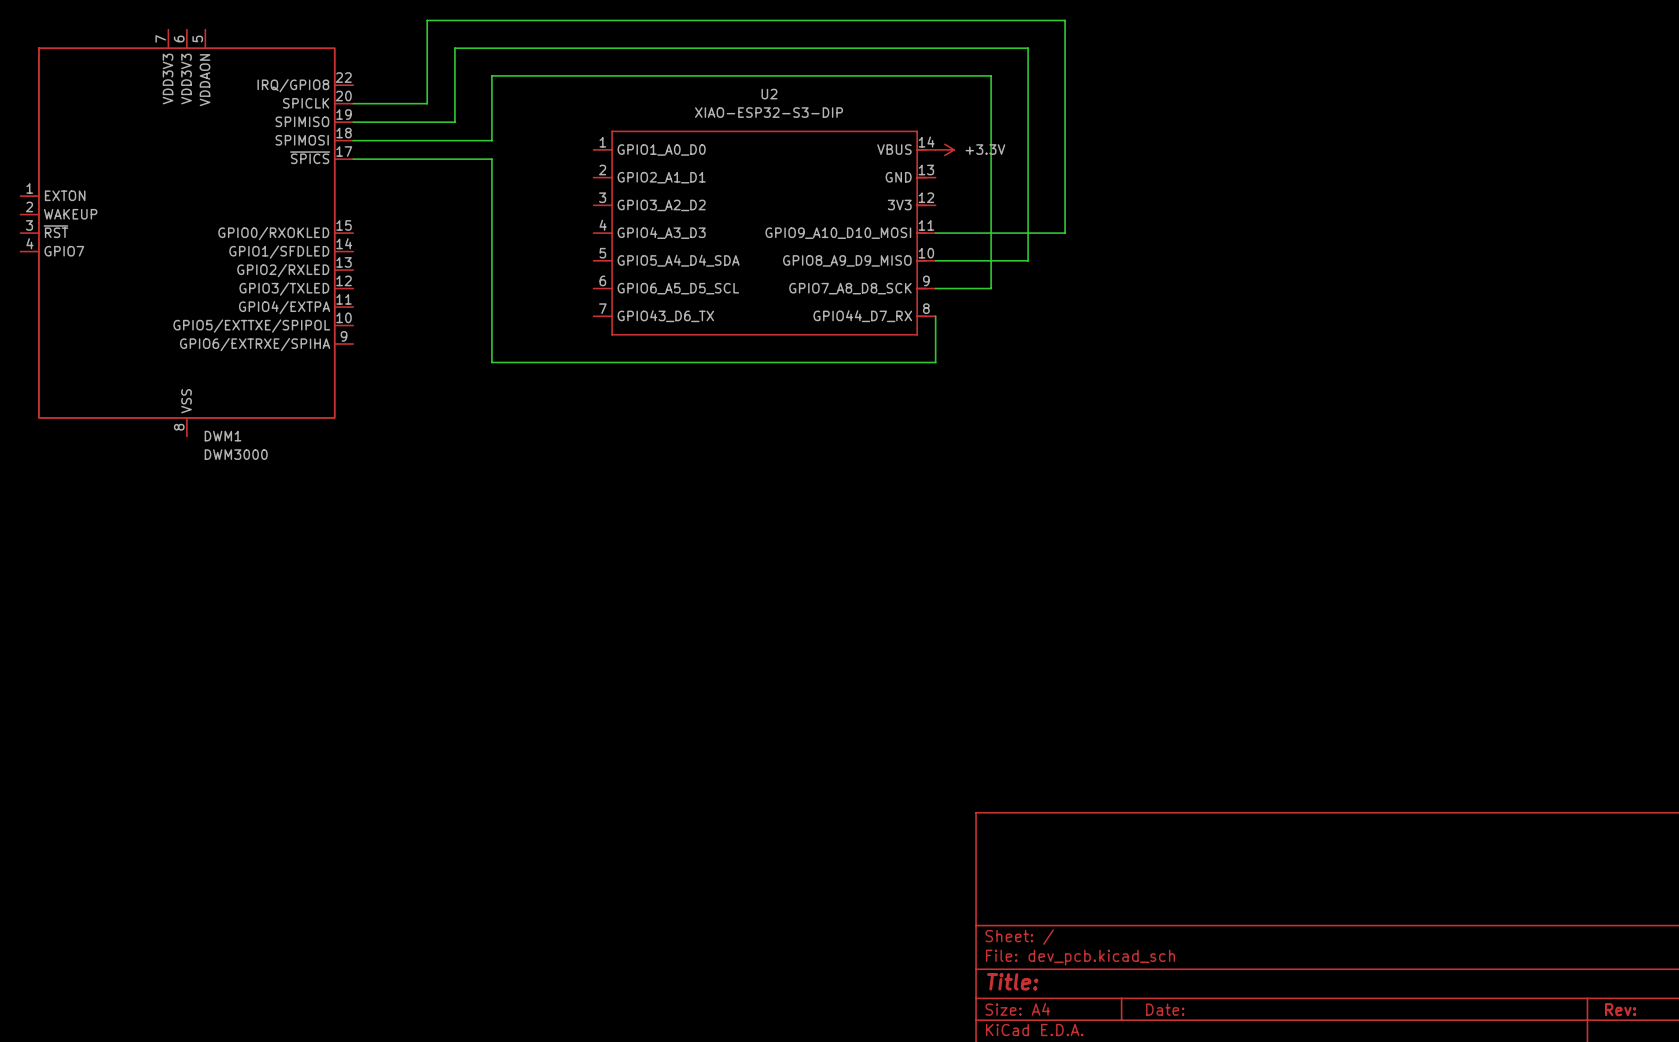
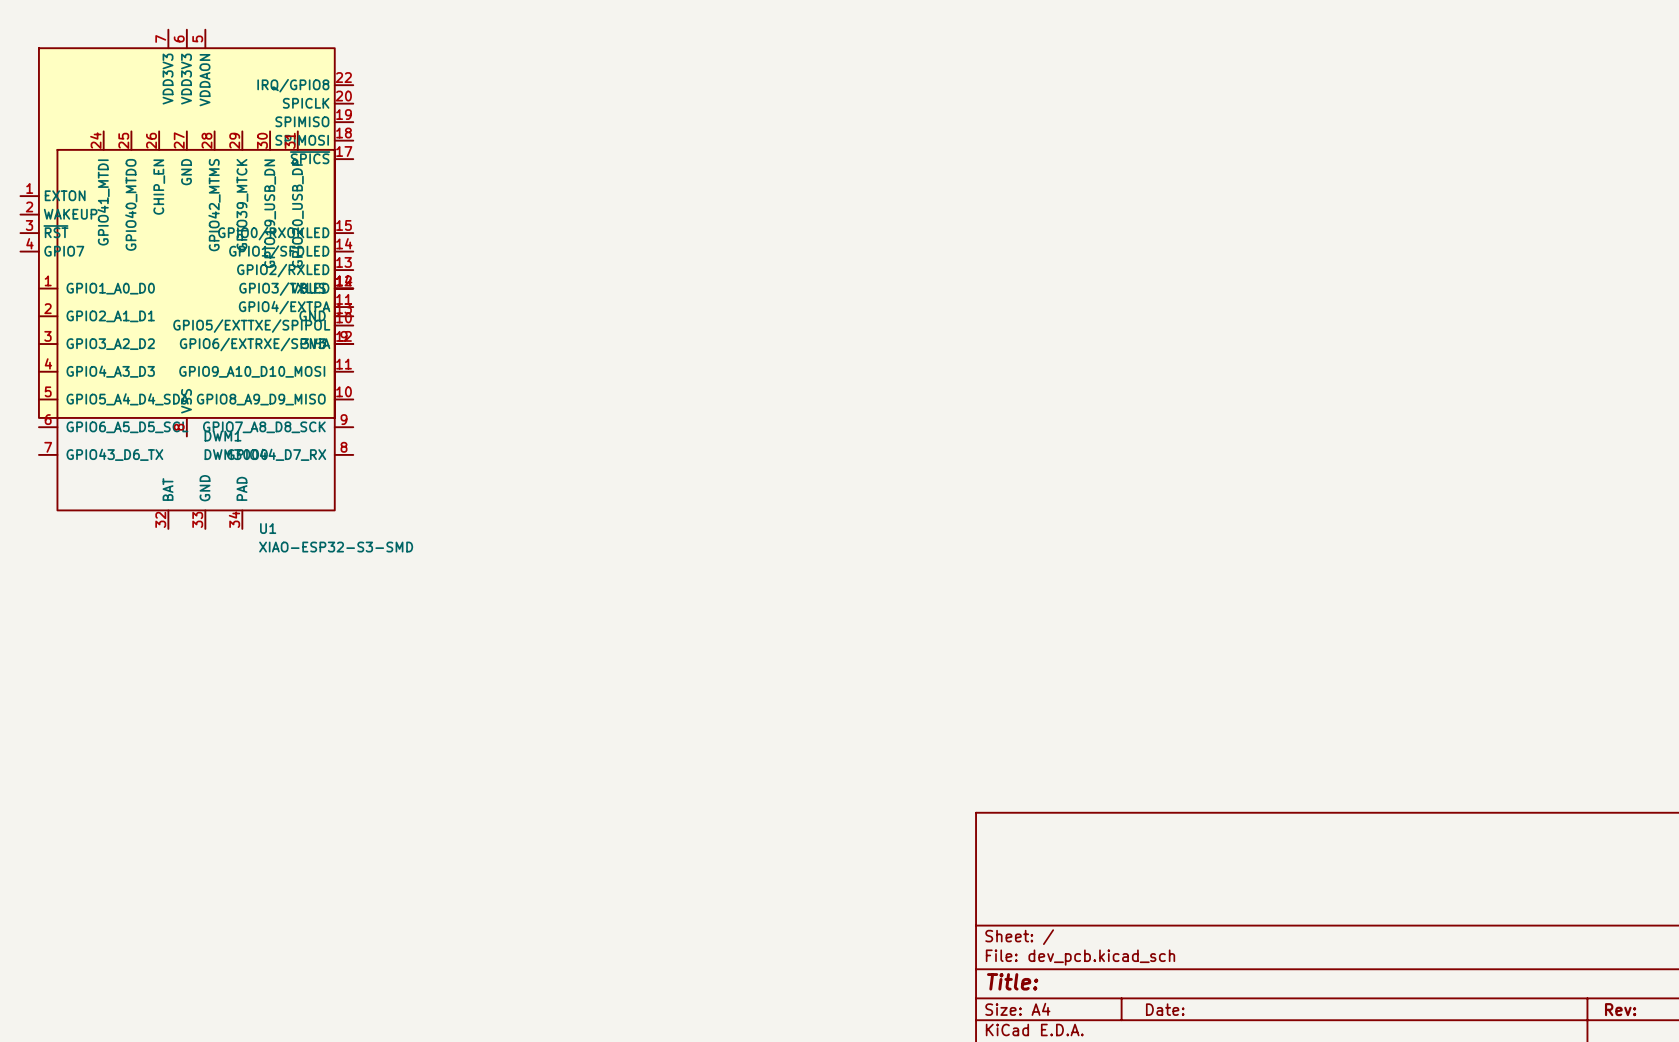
wire: (353, 103) (427, 103) (427, 20) (1065, 20) (1065, 233) (935, 233) -> none
wire: (353, 122) (454, 122) (454, 48) (1028, 48) (1028, 260) (935, 260) -> none
wire: (353, 140) (491, 140) (491, 75) (991, 75) (991, 288) (935, 288) -> none
power symbol: +3.3V (944, 149) -> none
wire: (353, 159) (491, 159) (491, 362) (935, 362) (935, 316) -> none
U2: XIAO-ESP32-S3-DIP (764, 233) -> none
U1: none -> XIAO-ESP32-S3-SMD (196, 330)

